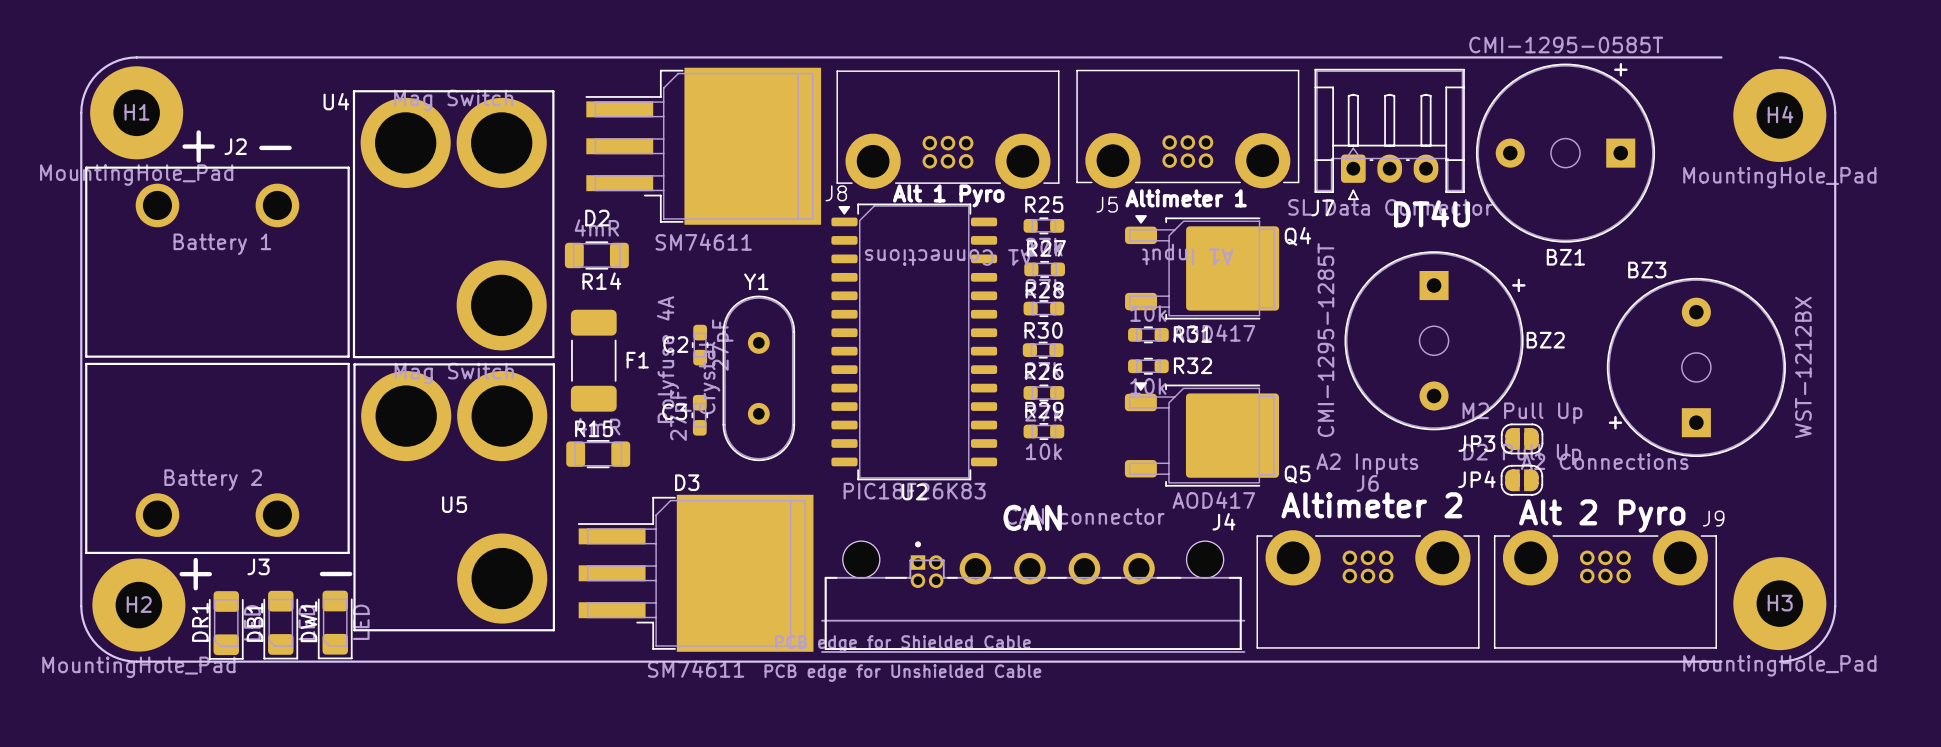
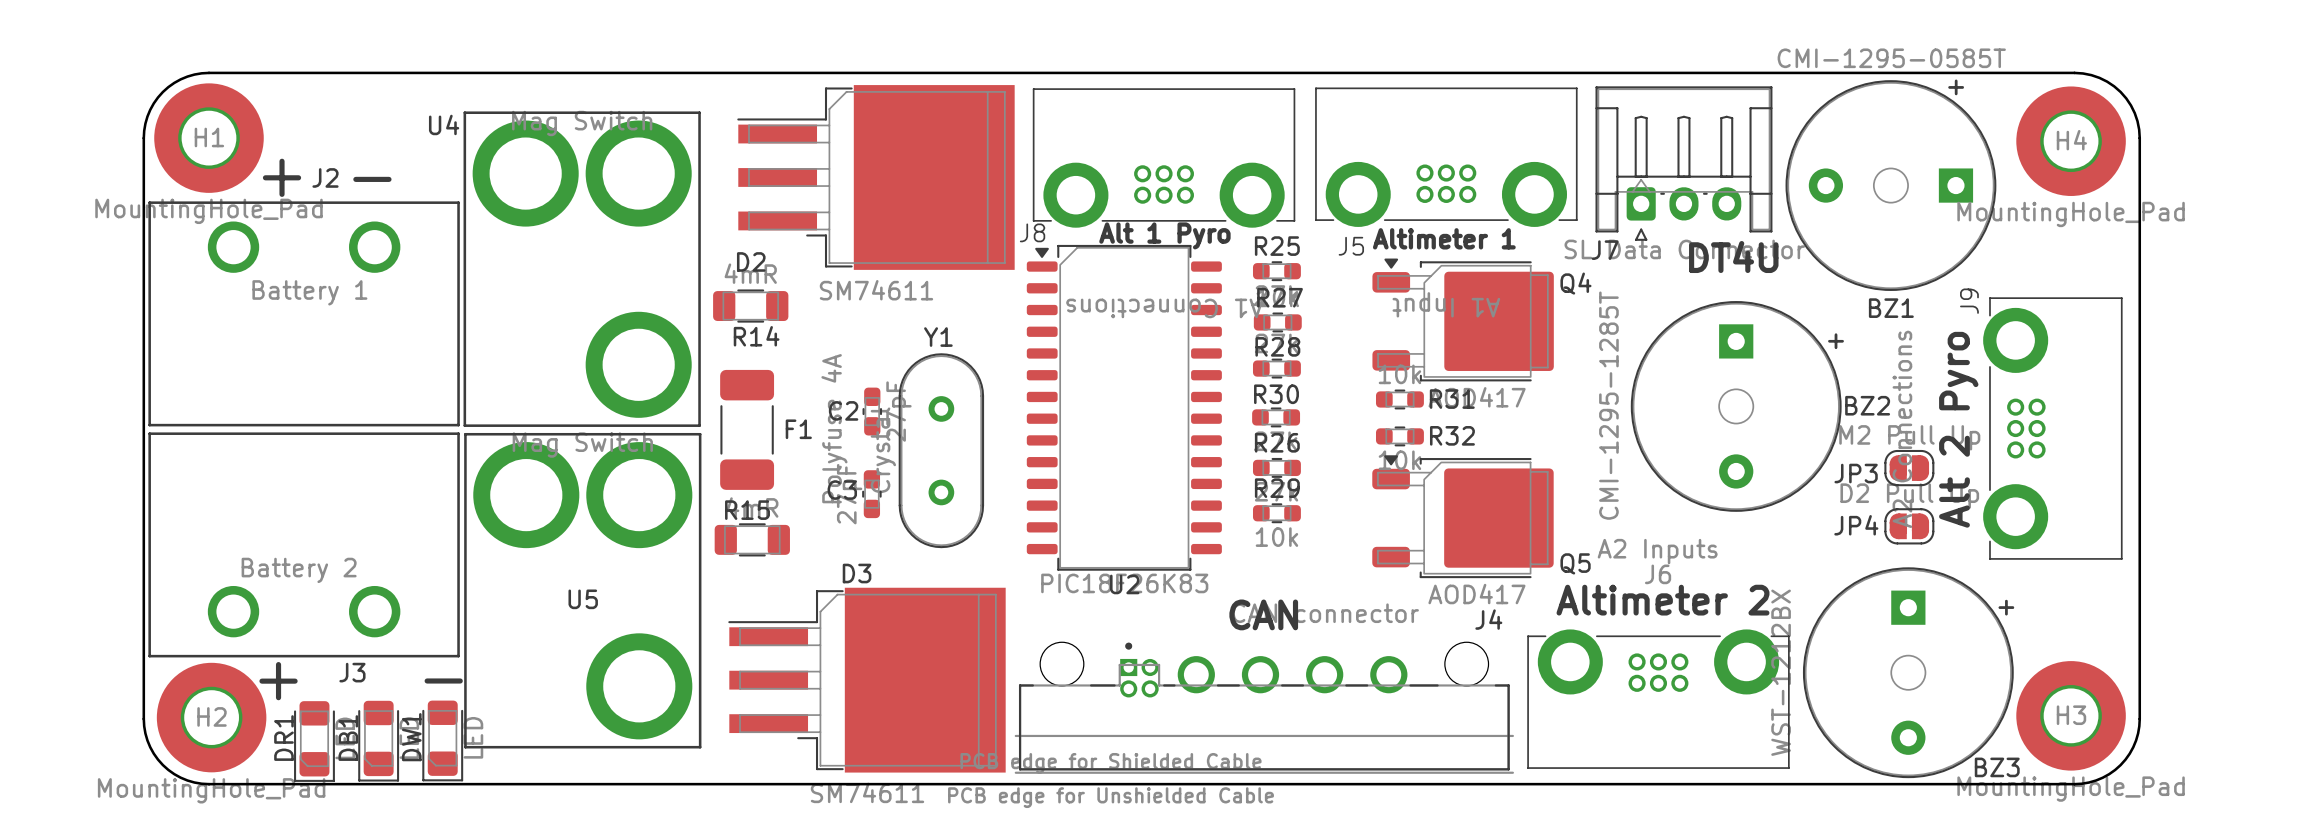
board edge: none -> (2074, 72) (2099, 77) (2120, 92) (2134, 113) (2139, 138) (2139, 726) (2133, 747) (2120, 765) (2102, 777) (2089, 782) (2074, 784)
board edge: (1779, 57) (1803, 62) (1818, 73) (1829, 88) (1835, 112) (1834, 612) (1826, 635) (1814, 649) (1798, 658) (1779, 661) -> none
H4 position: (1779, 115) -> (2071, 141)
BZ3 name position: BZ3 (1647, 270) -> BZ3 (1997, 767)
BZ3 rotation: 0° (1696, 367) -> 180° (1908, 672)
BZ3 position: (1696, 367) -> (1908, 672)
JP3 position: (1522, 438) -> (1909, 468)
JP4 position: (1521, 480) -> (1909, 526)
text rotation: 0° (1602, 516) -> 90° counterclockwise (1958, 429)
J9 rotation: 0° (1605, 589) -> 90° counterclockwise (2052, 428)
J9 position: (1605, 589) -> (2052, 428)
H3 position: (1779, 603) -> (2071, 715)

